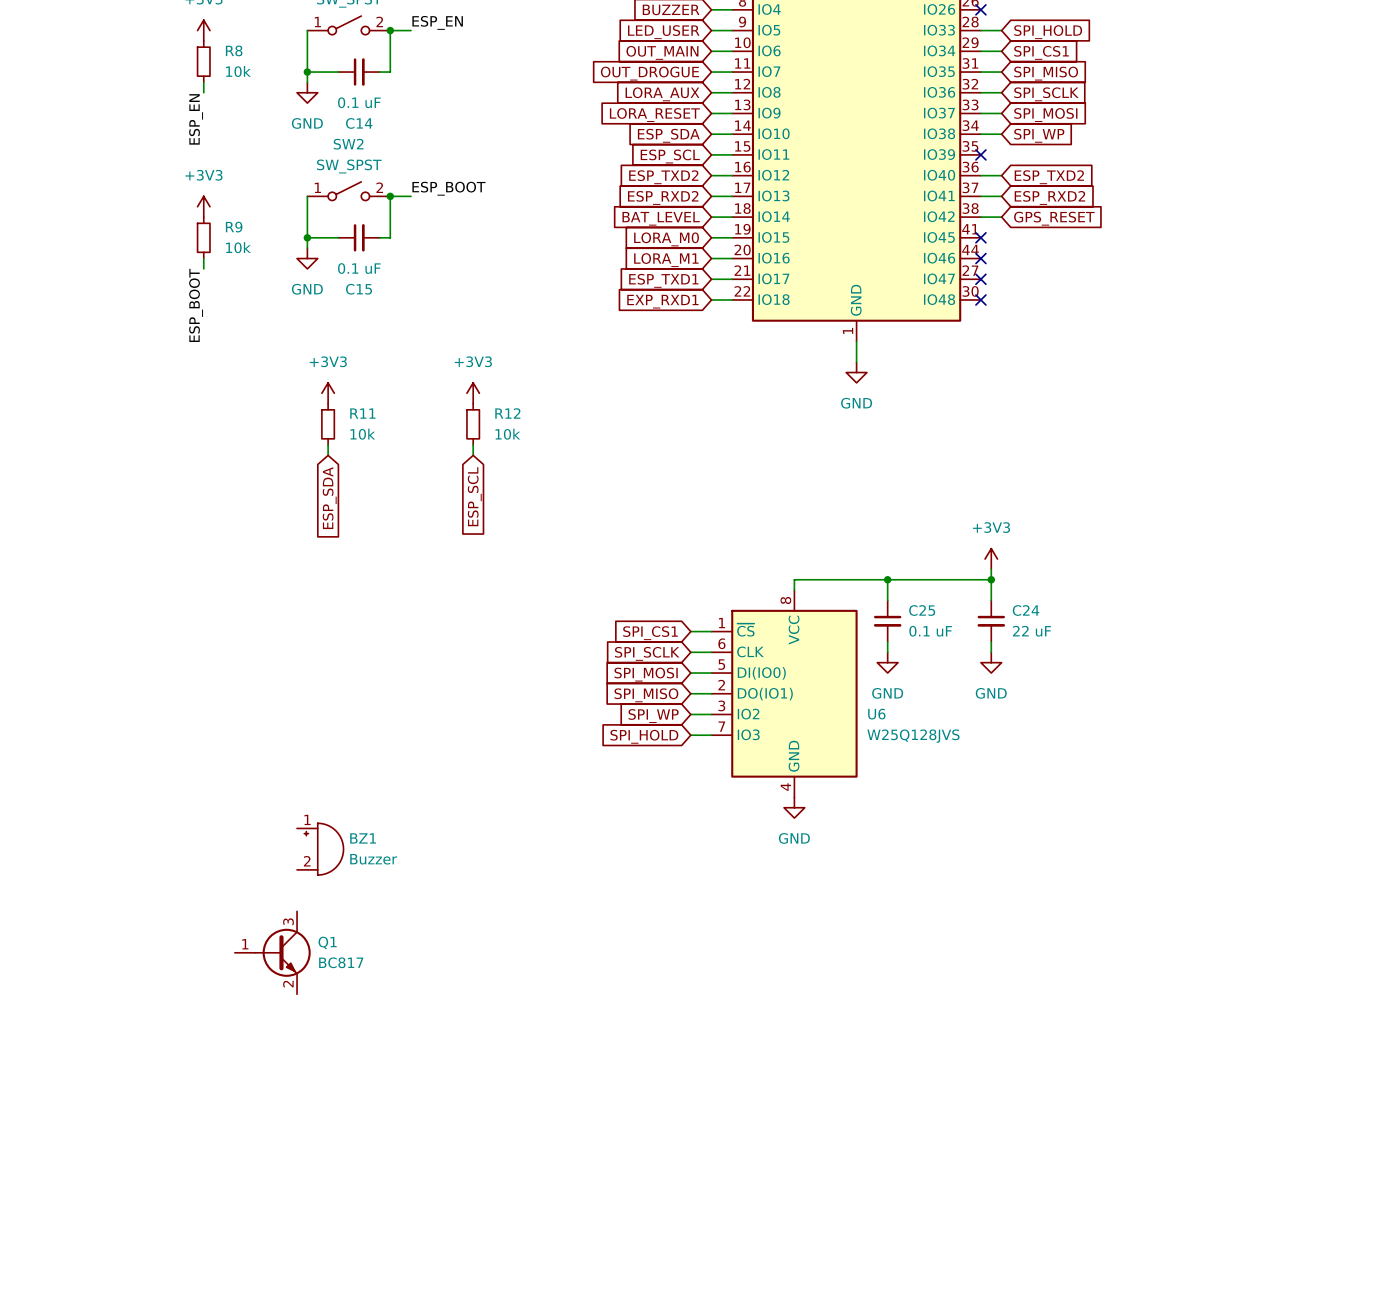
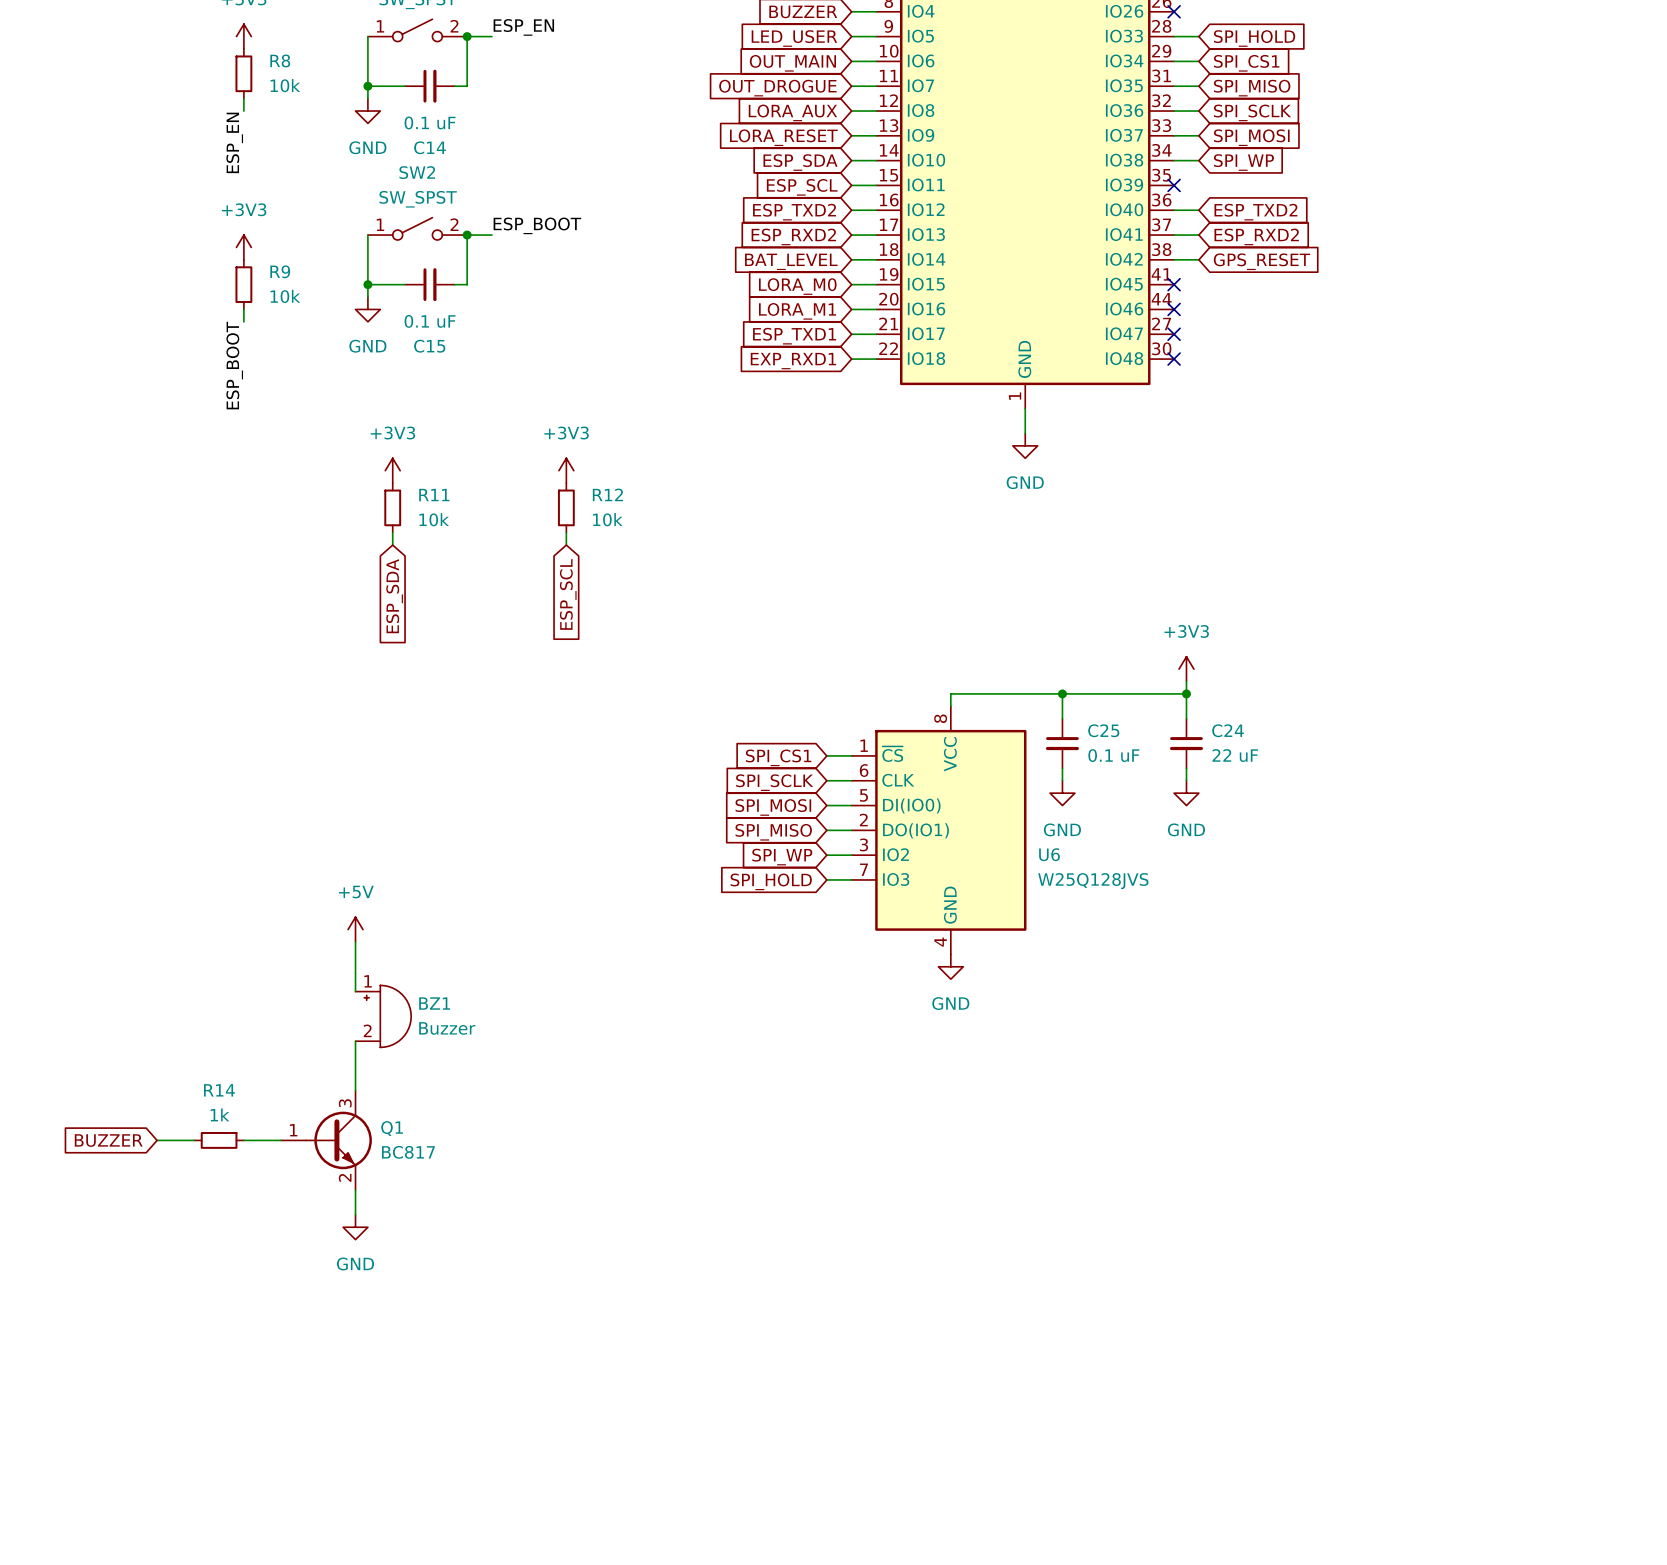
power symbol: none -> +5V (355, 929)
wire: none -> (355, 941) (355, 991)
wire: none -> (355, 1041) (355, 1090)
global label: none -> BUZZER (108, 1140)
wire: none -> (157, 1140) (194, 1140)
R14: none -> 1k (219, 1140)
wire: none -> (243, 1140) (281, 1140)
wire: none -> (355, 1190) (355, 1214)
power symbol: none -> GND (355, 1227)

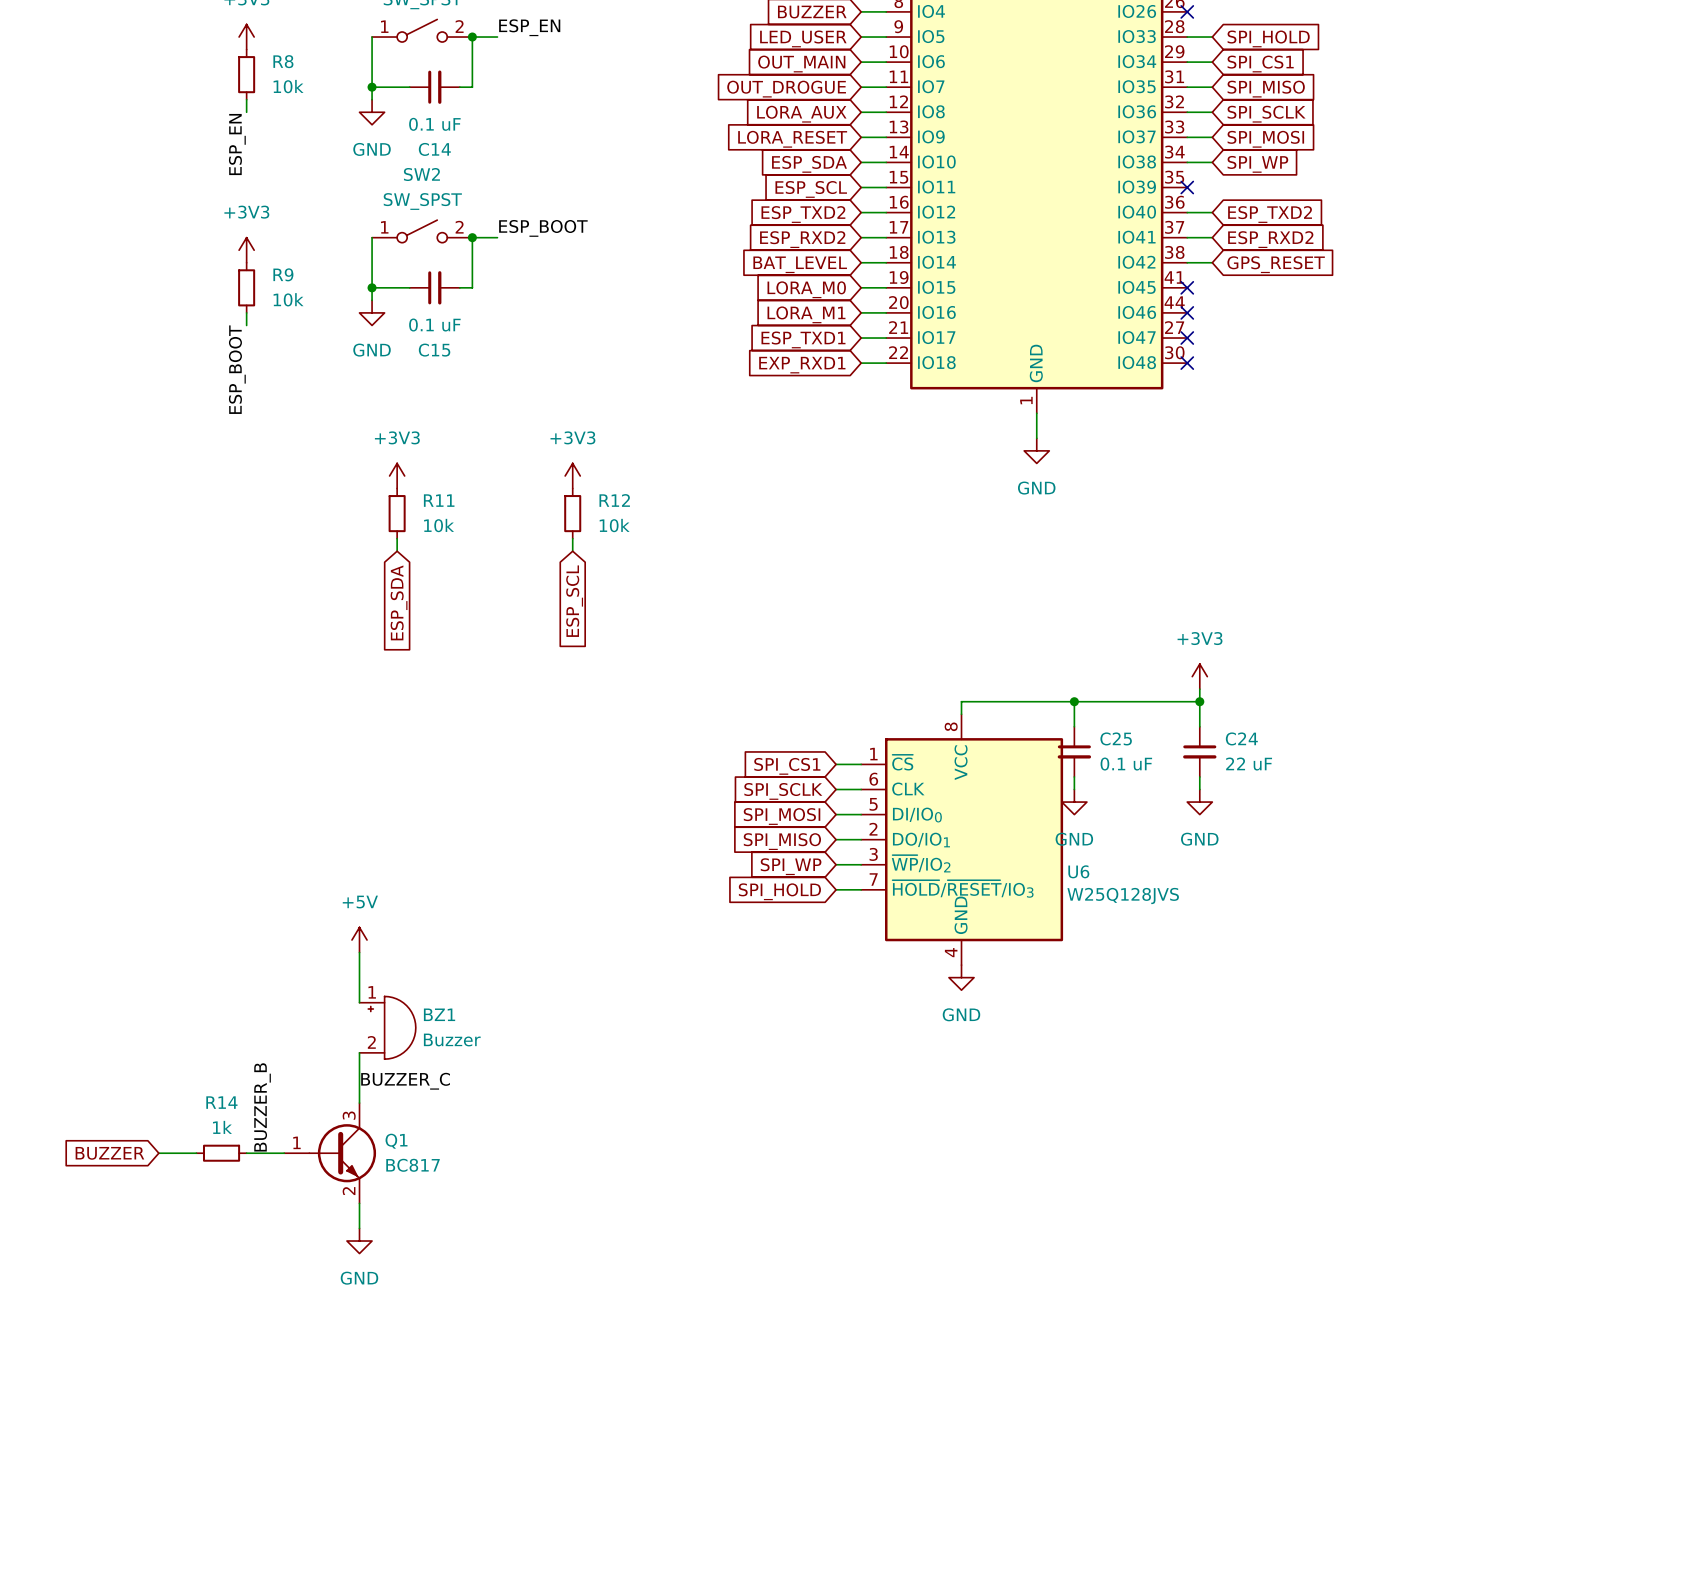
U6 symbol: [851, 706, 1027, 955] -> [861, 714, 1064, 966]
label: none -> BUZZER_C (405, 1081)
label: none -> BUZZER_B (262, 1107)

